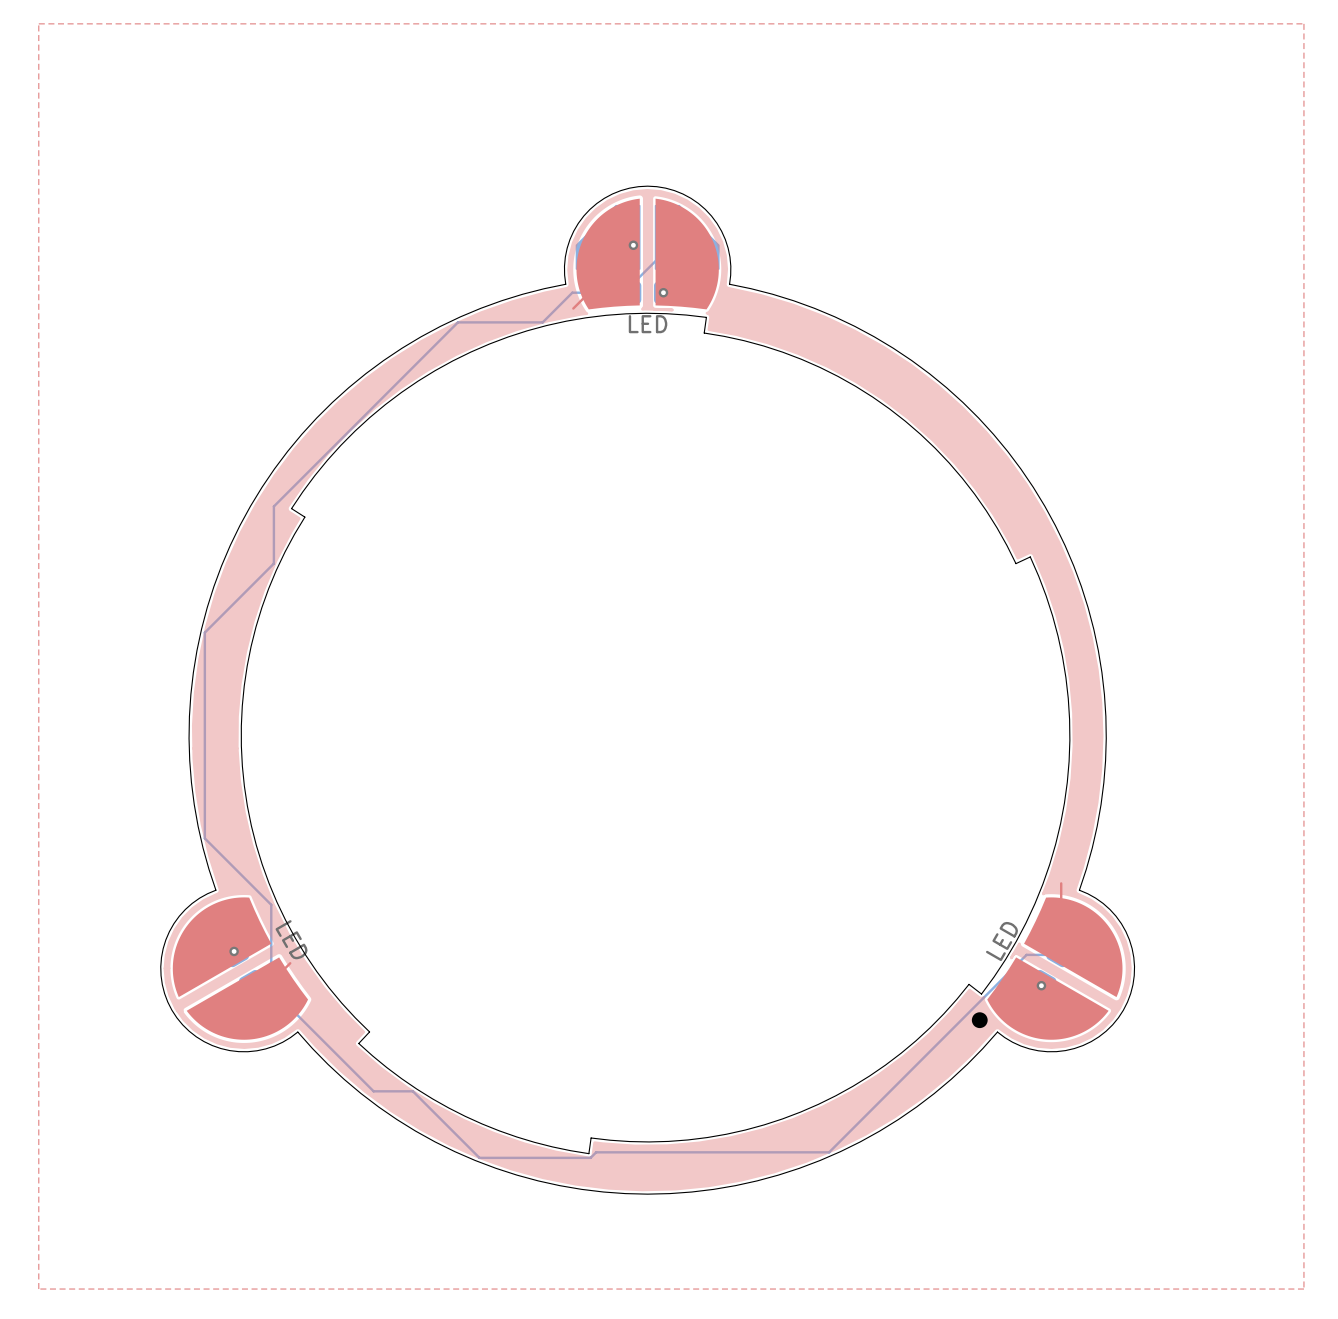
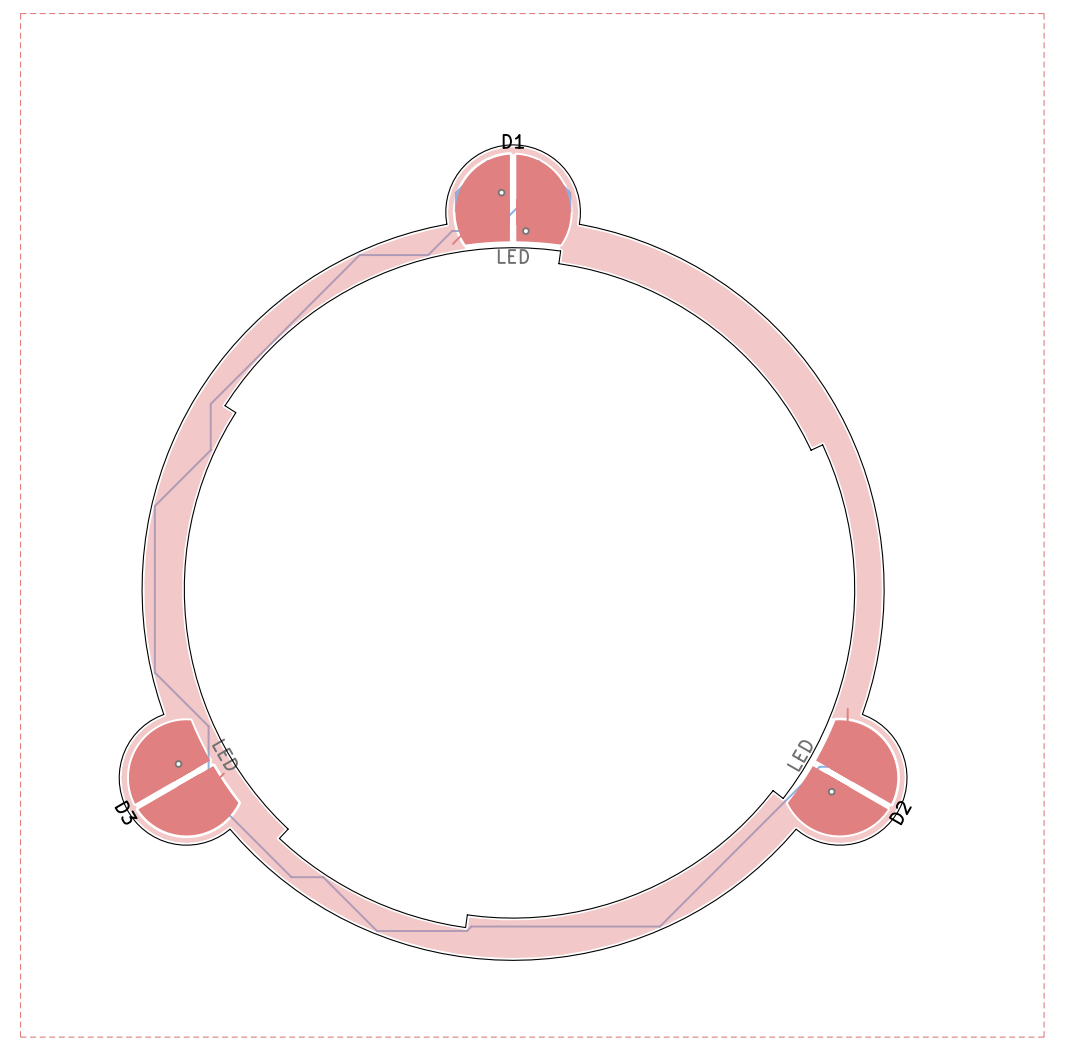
D1: none -> LED (513, 199)
part: LED (647, 254) -> none
part: LED (240, 968) -> none
D3: none -> LED (183, 777)
part: LED (1054, 968) -> none
D2: none -> LED (842, 777)
drawing: [971, 1012, 988, 1029] -> none

